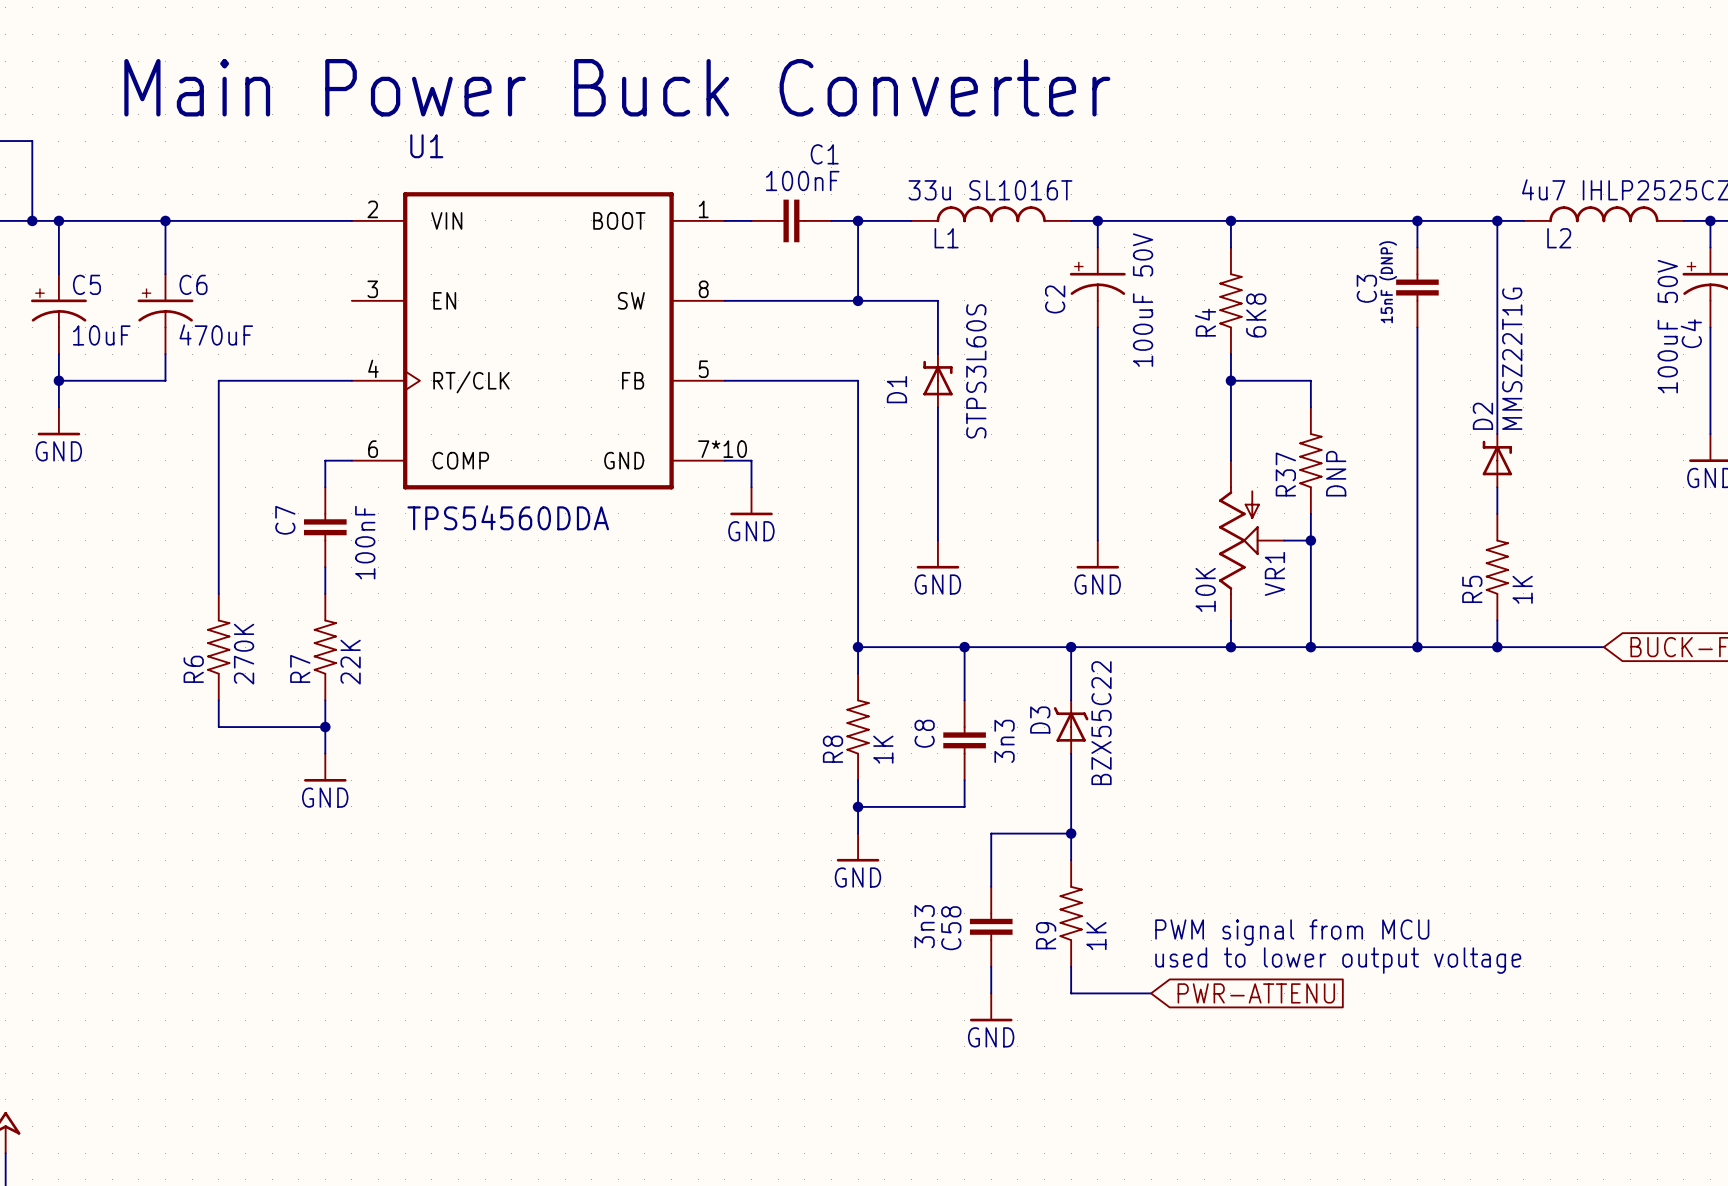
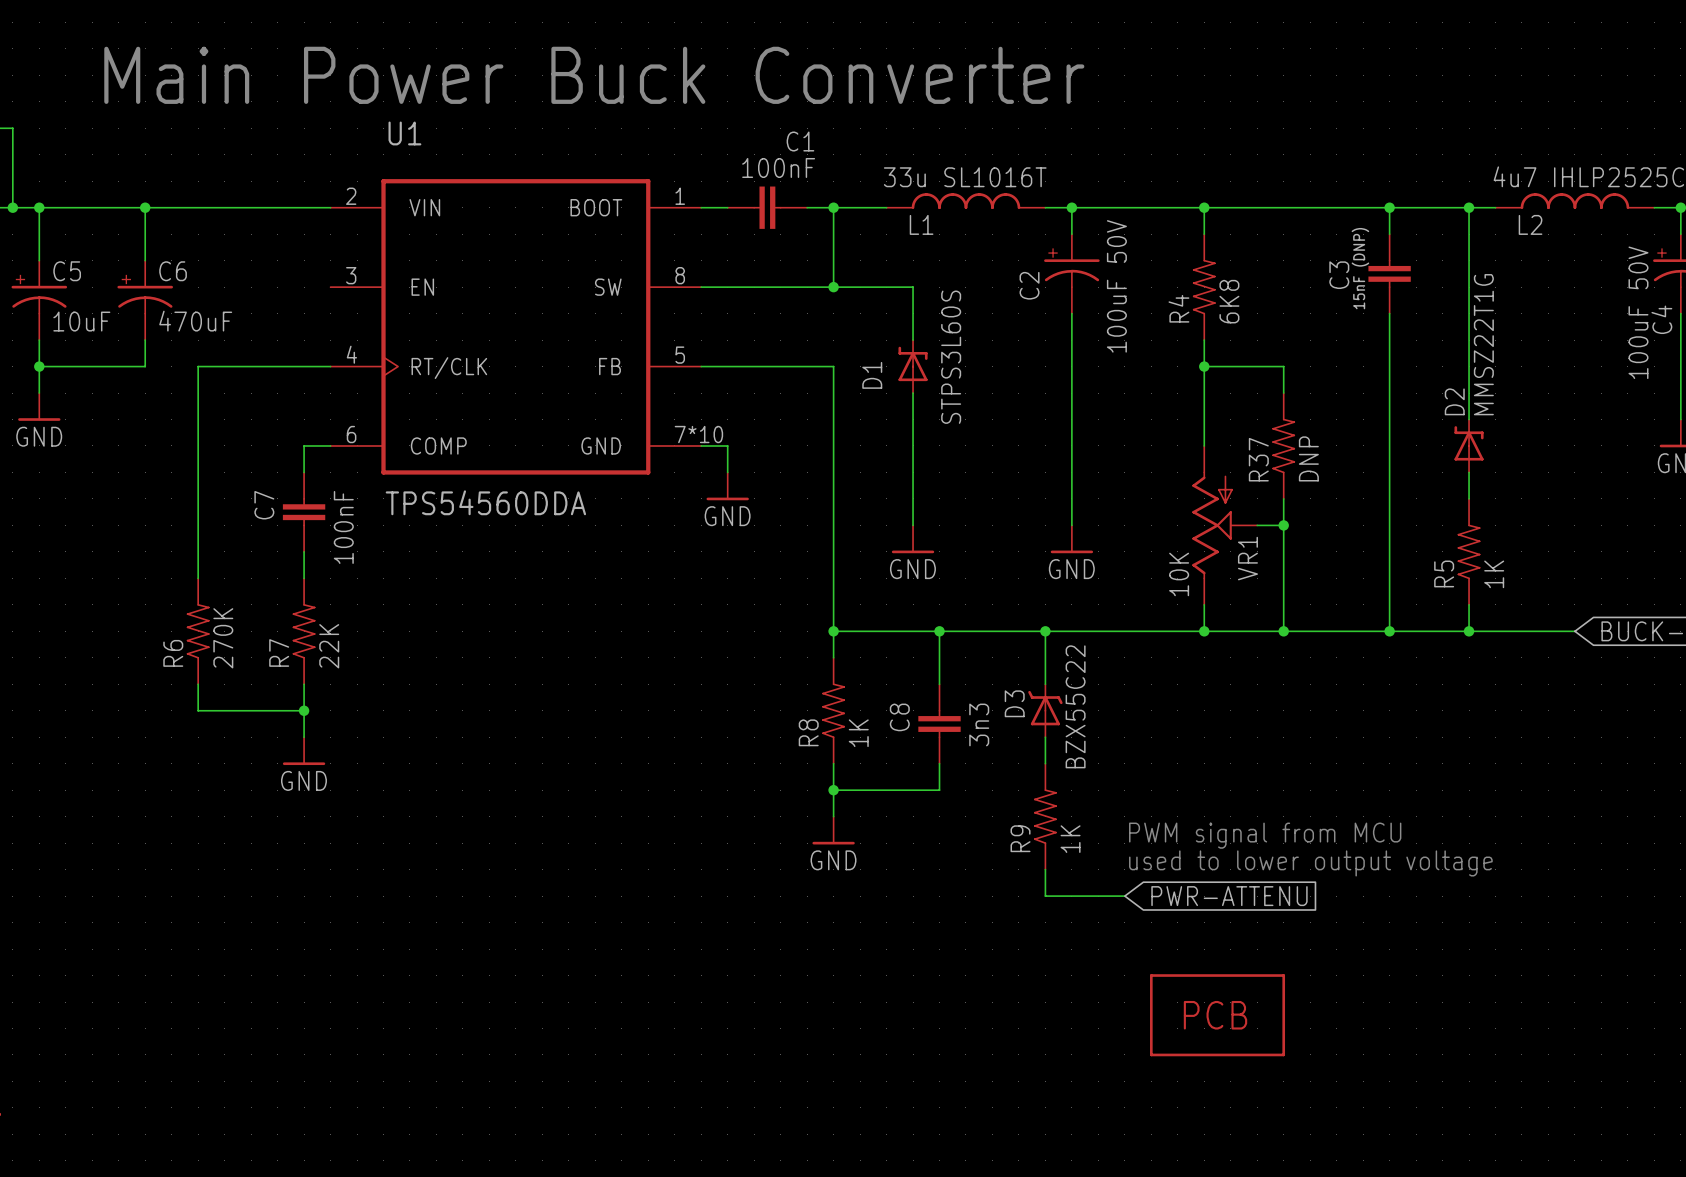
wire: (1071, 833) (991, 833) (991, 886) -> none
junction: (1071, 833) -> none
R9 position: (1071, 913) -> (1045, 816)
C58: 3n3 (991, 926) -> none
text position: PWM signal from MCU (1292, 932) -> PWM signal from MCU (1265, 835)
text position: used to lower output voltage (1338, 960) -> used to lower output voltage (1310, 863)
wire: (991, 966) (991, 993) -> none
wire: (1071, 966) (1071, 993) (1151, 993) -> (1045, 869) (1045, 896) (1124, 896)
global label position: PWR-ATTENU (1256, 993) -> PWR-ATTENU (1229, 896)
power symbol: GND (991, 1007) -> none
part: none -> (1217, 1015)

